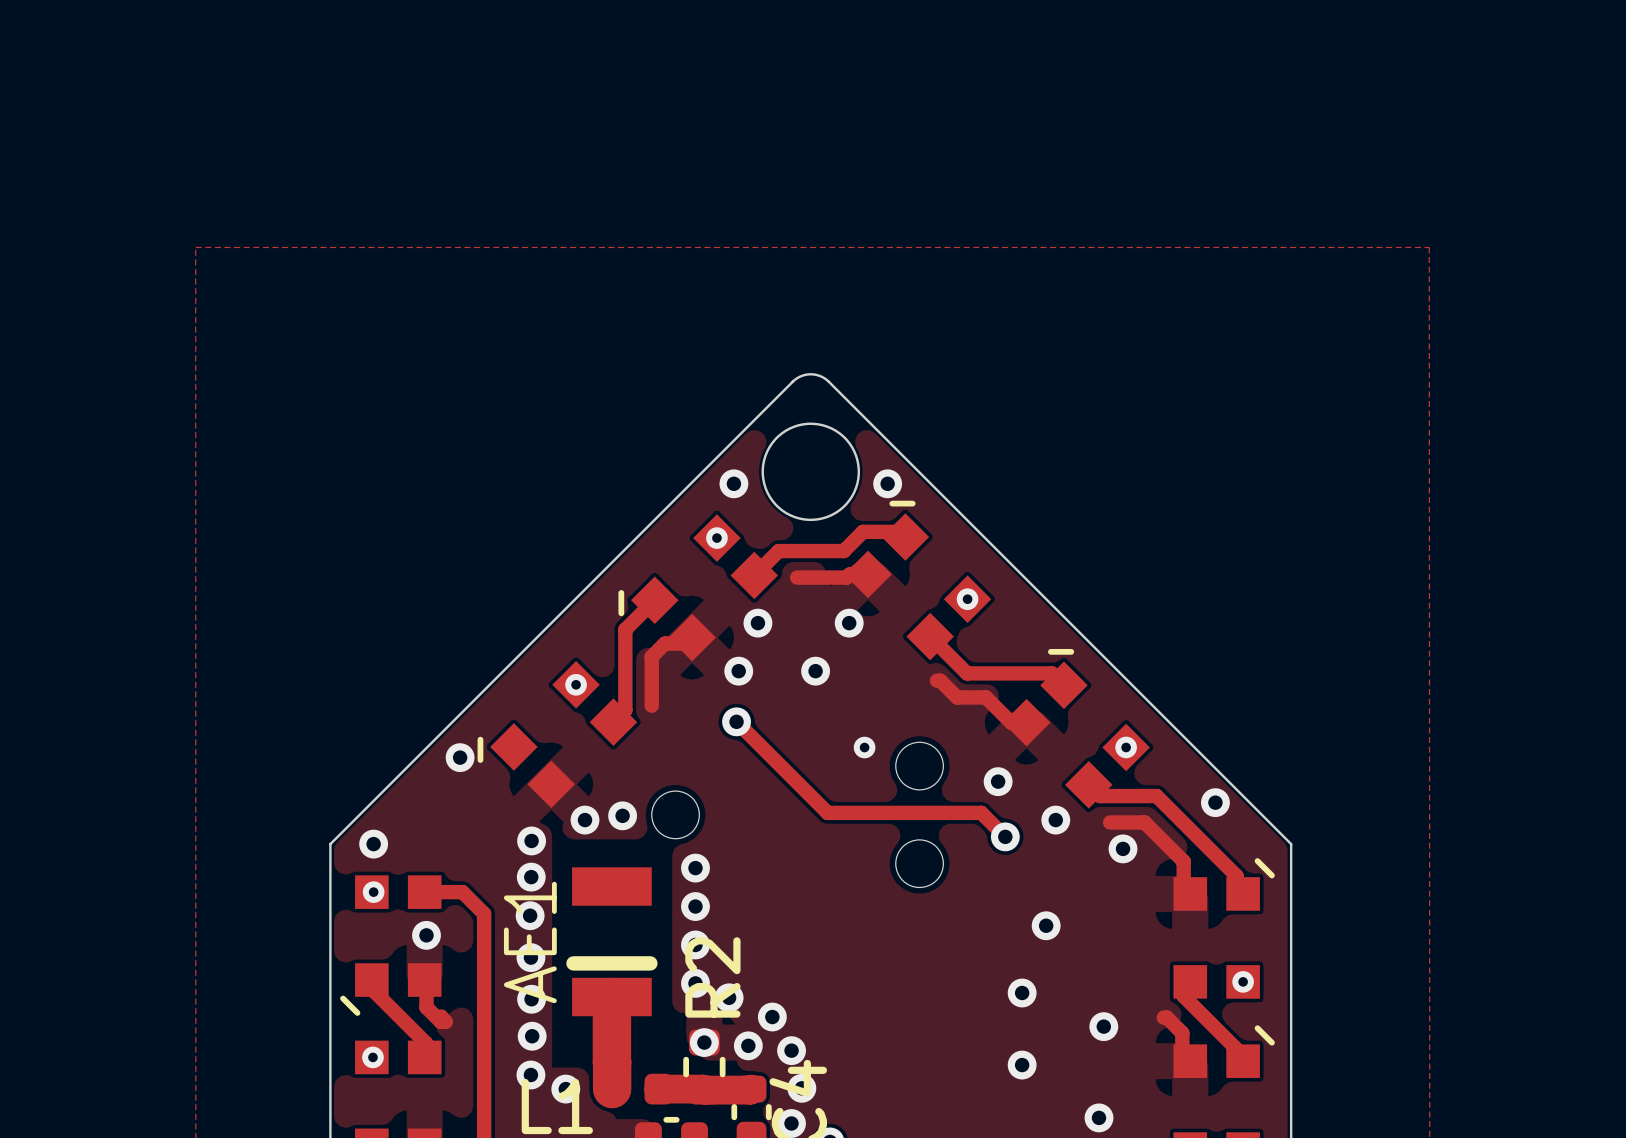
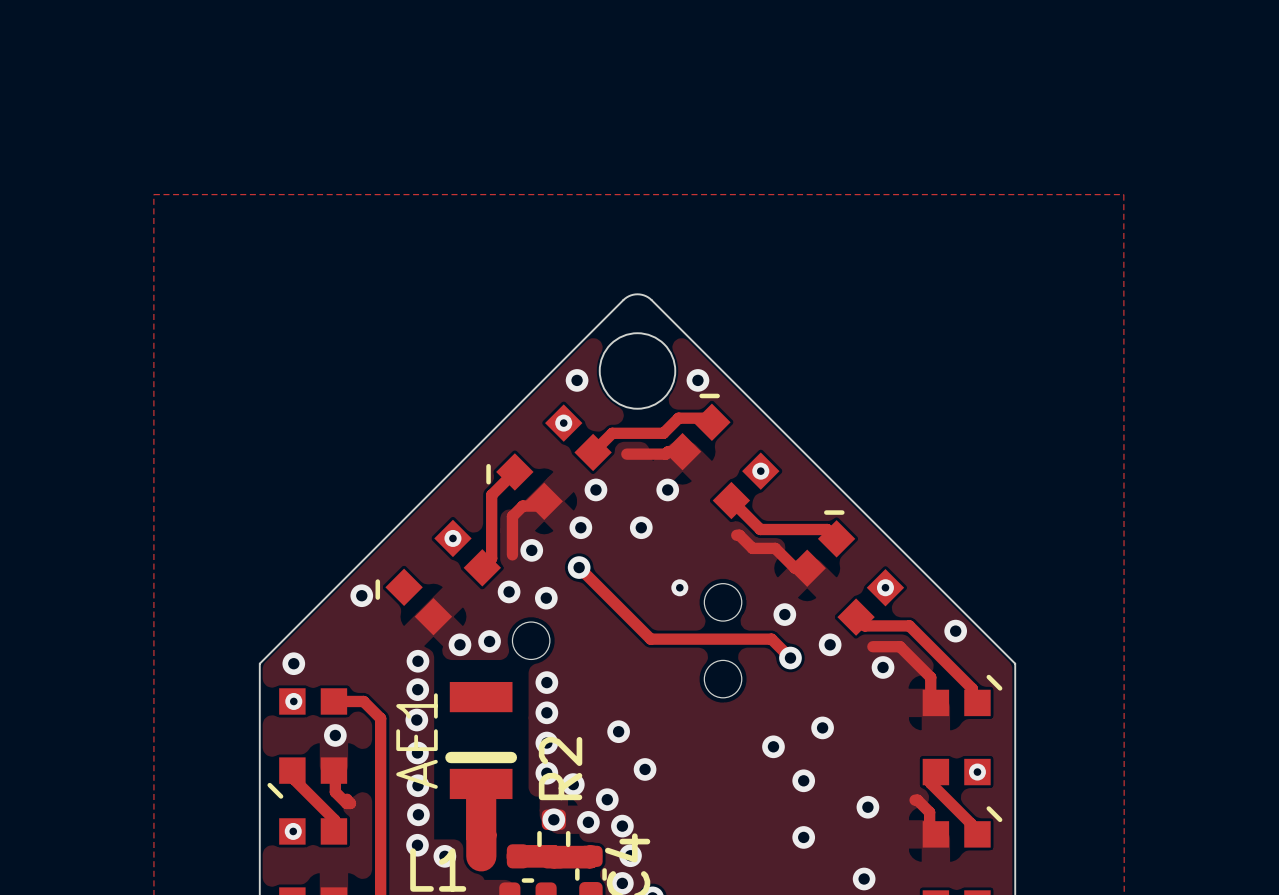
via: none -> (531, 550)
via: none -> (509, 591)
via: none -> (546, 598)
via: none -> (618, 731)
via: none -> (773, 746)
via: none -> (645, 769)

